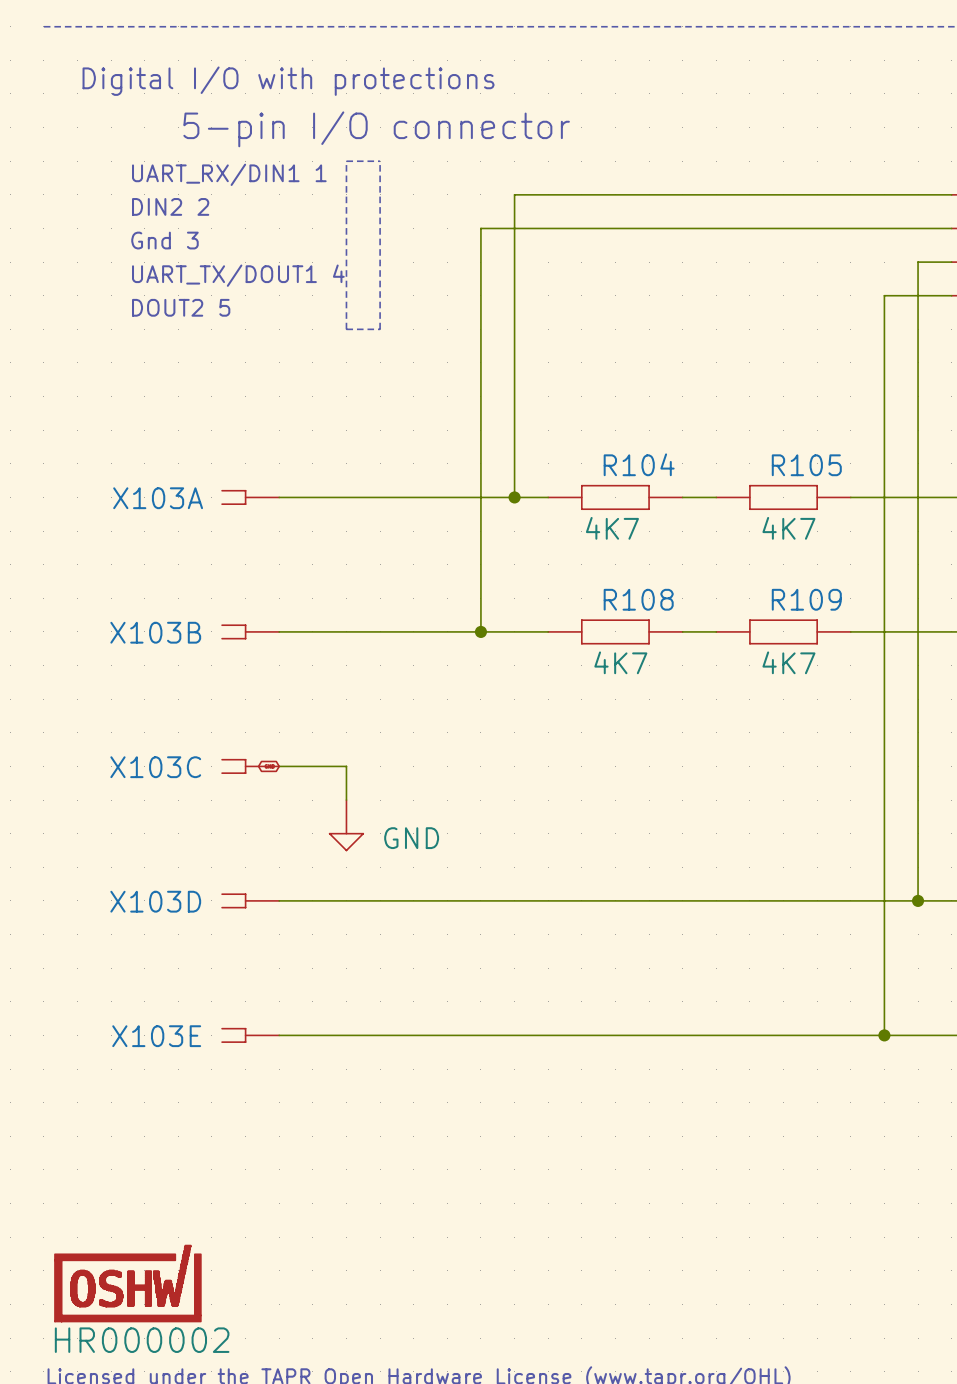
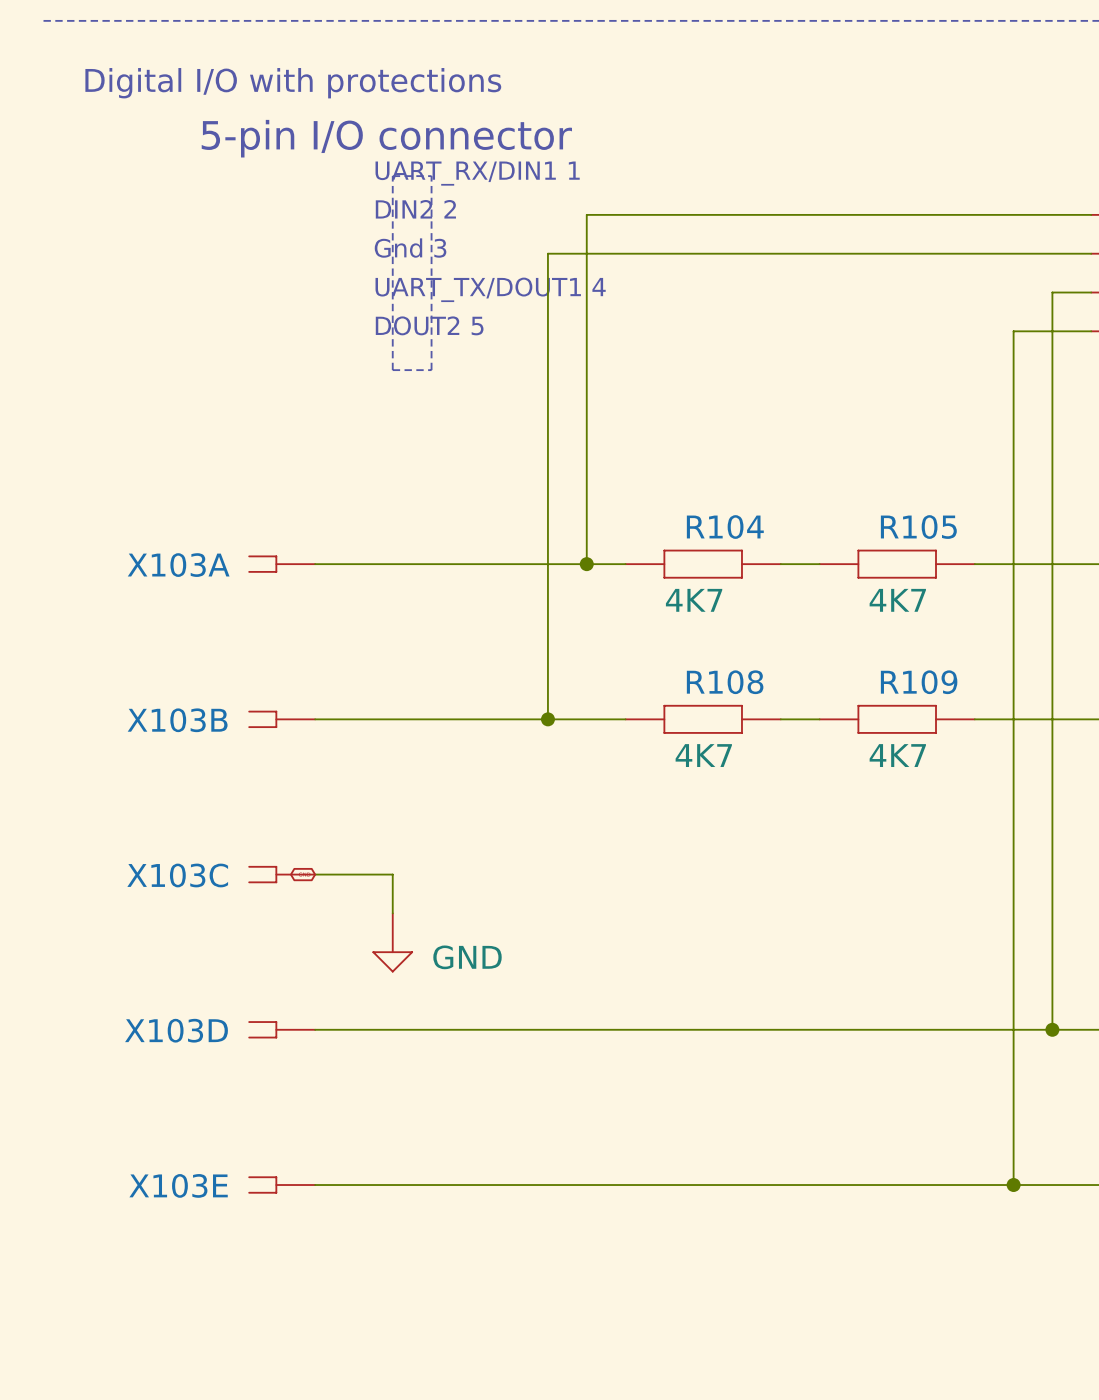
text position: UART_RX/DIN1 1 (229, 174) -> UART_RX/DIN1 1 (477, 173)
text position: DIN2 2 (170, 206) -> DIN2 2 (415, 209)
text position: Gnd 3 (164, 240) -> Gnd 3 (410, 248)
text position: UART_TX/DOUT1 4 (238, 275) -> UART_TX/DOUT1 4 (490, 289)
text position: DOUT2 5 (181, 307) -> DOUT2 5 (429, 325)

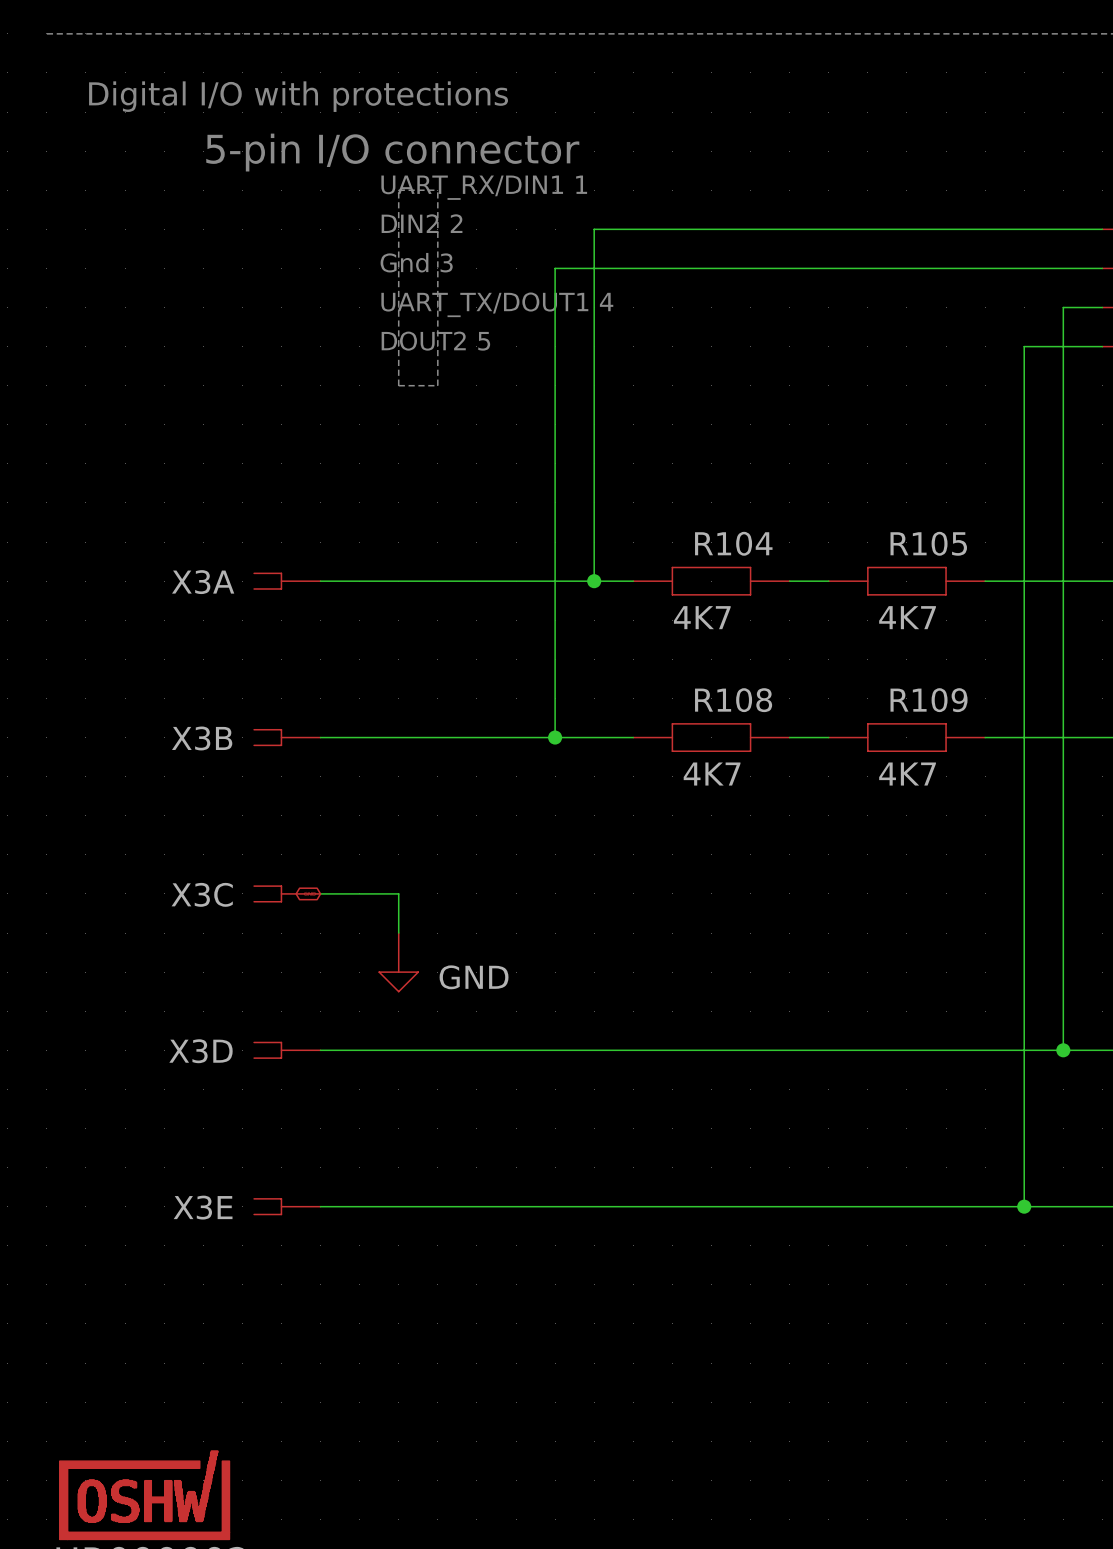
X103A name: X103A (178, 565) -> X3A (203, 582)
X103B name: X103B (177, 720) -> X3B (202, 738)
X103C name: X103C (177, 875) -> X3C (202, 894)
X103D name: X103D (176, 1030) -> X3D (200, 1051)
X103E name: X103E (178, 1185) -> X3E (203, 1207)

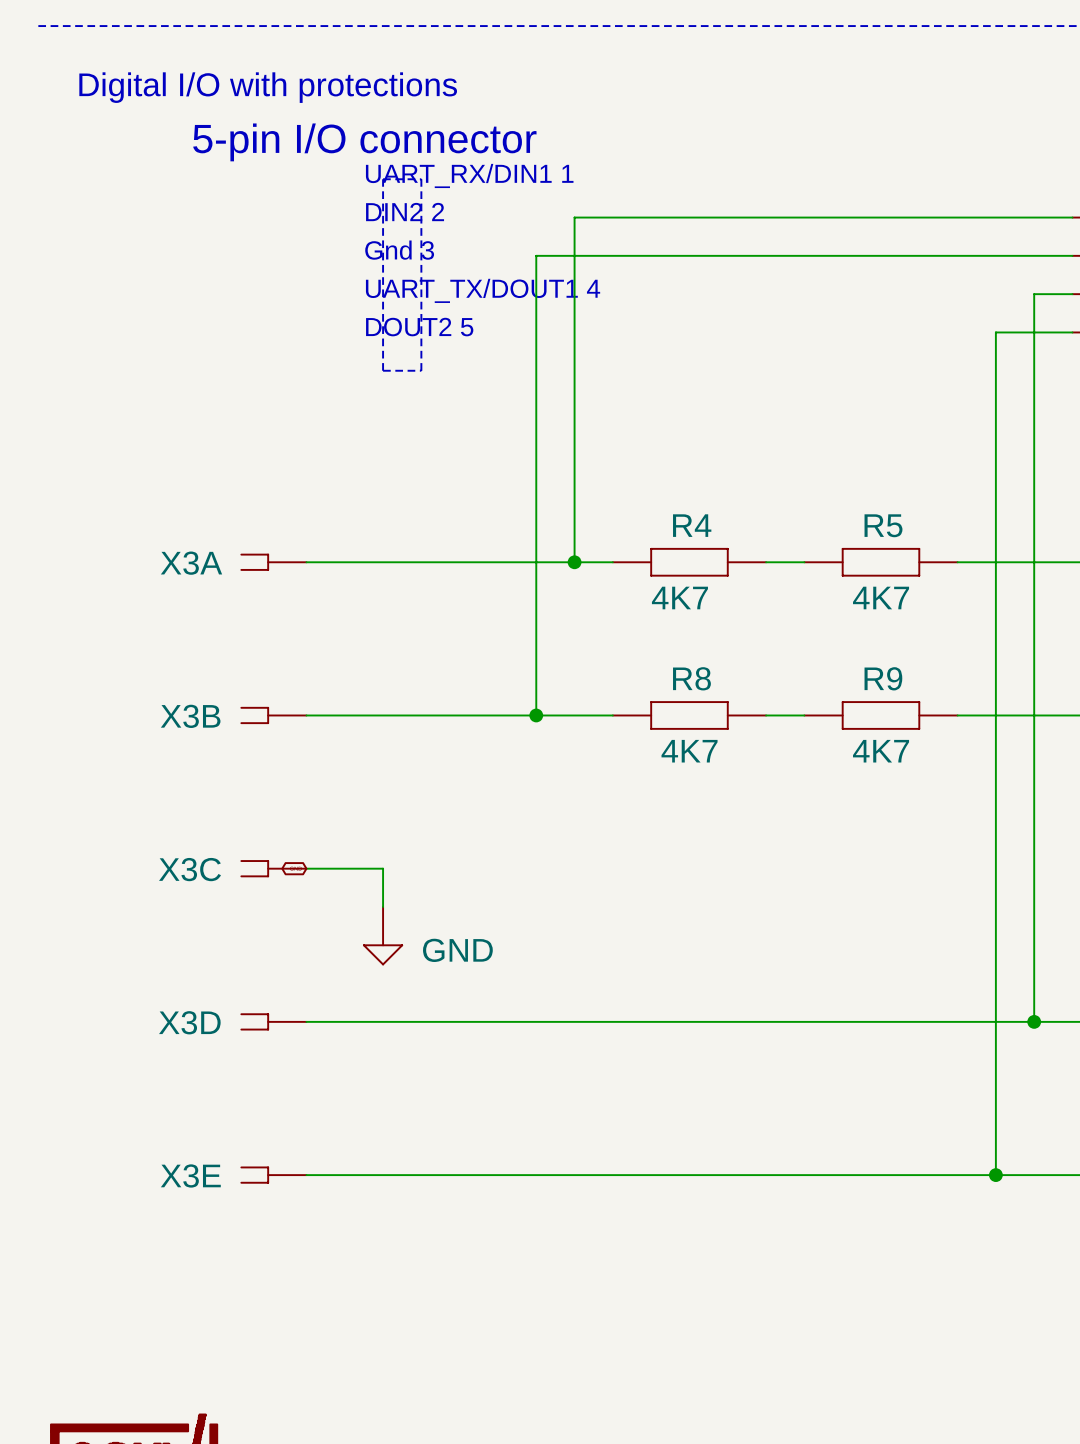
R104 name: R104 (733, 543) -> R4 (692, 525)
R105 name: R105 (928, 543) -> R5 (883, 525)
R108 name: R108 (733, 700) -> R8 (691, 678)
R109 name: R109 (929, 700) -> R9 (883, 678)

